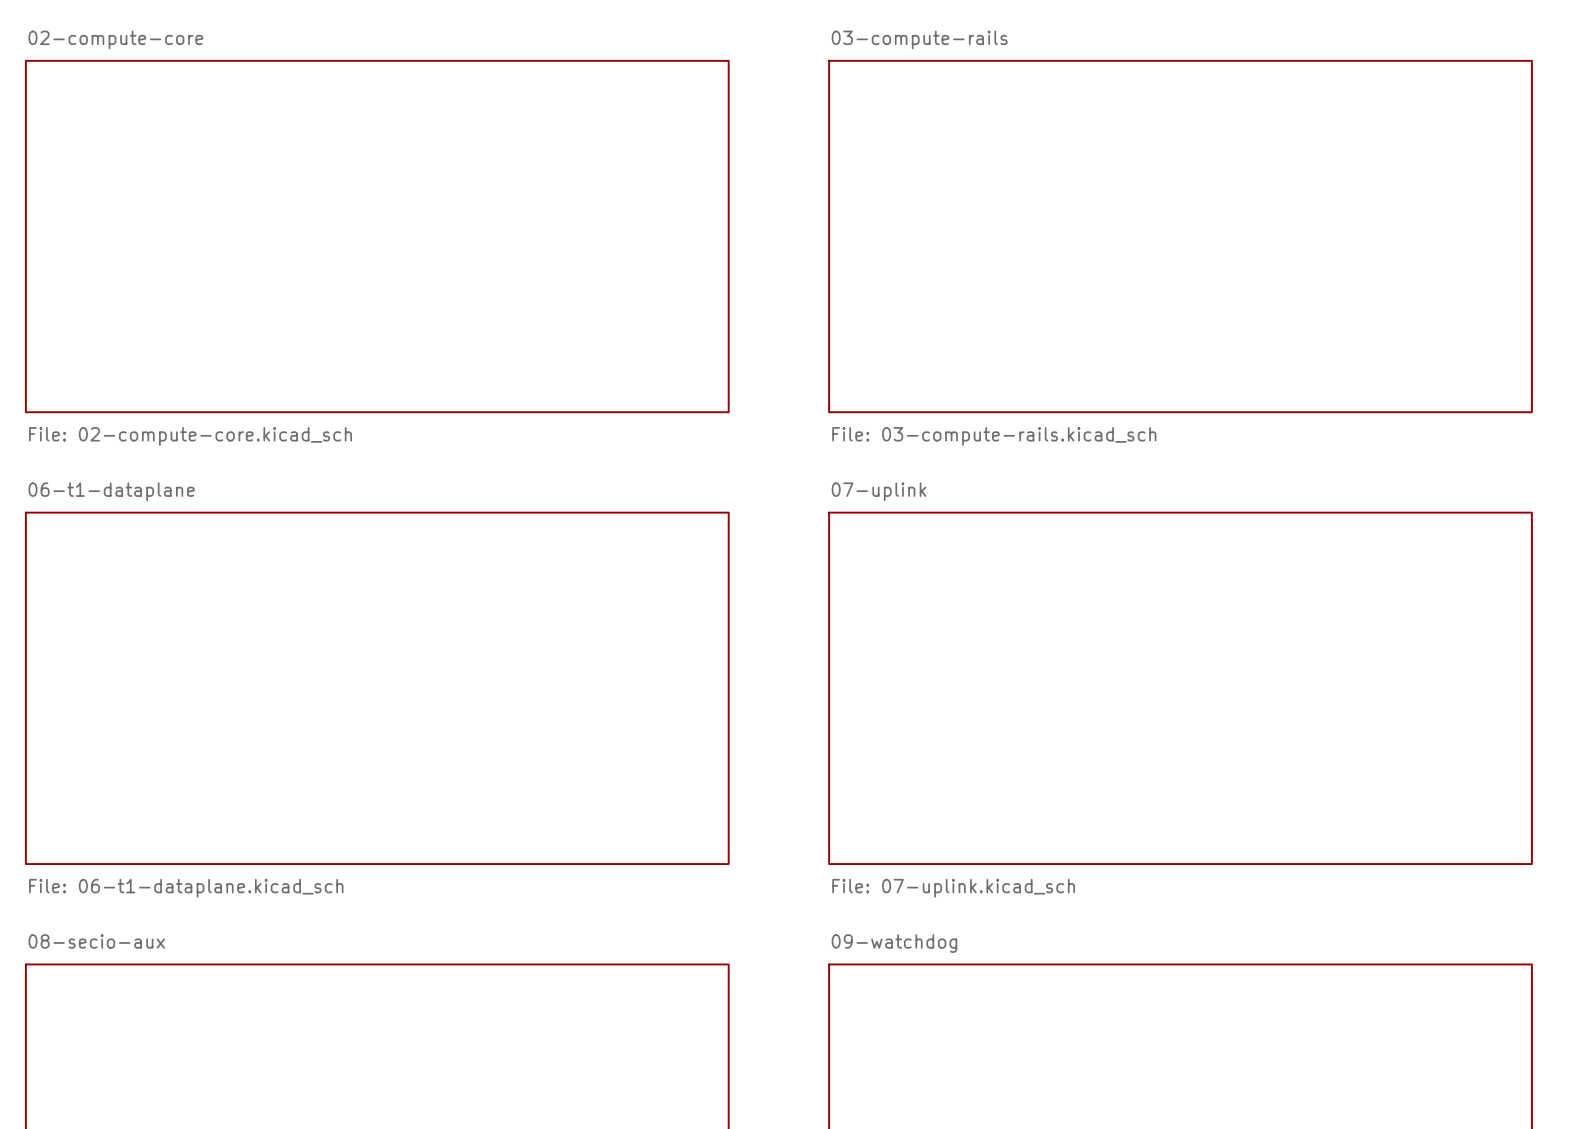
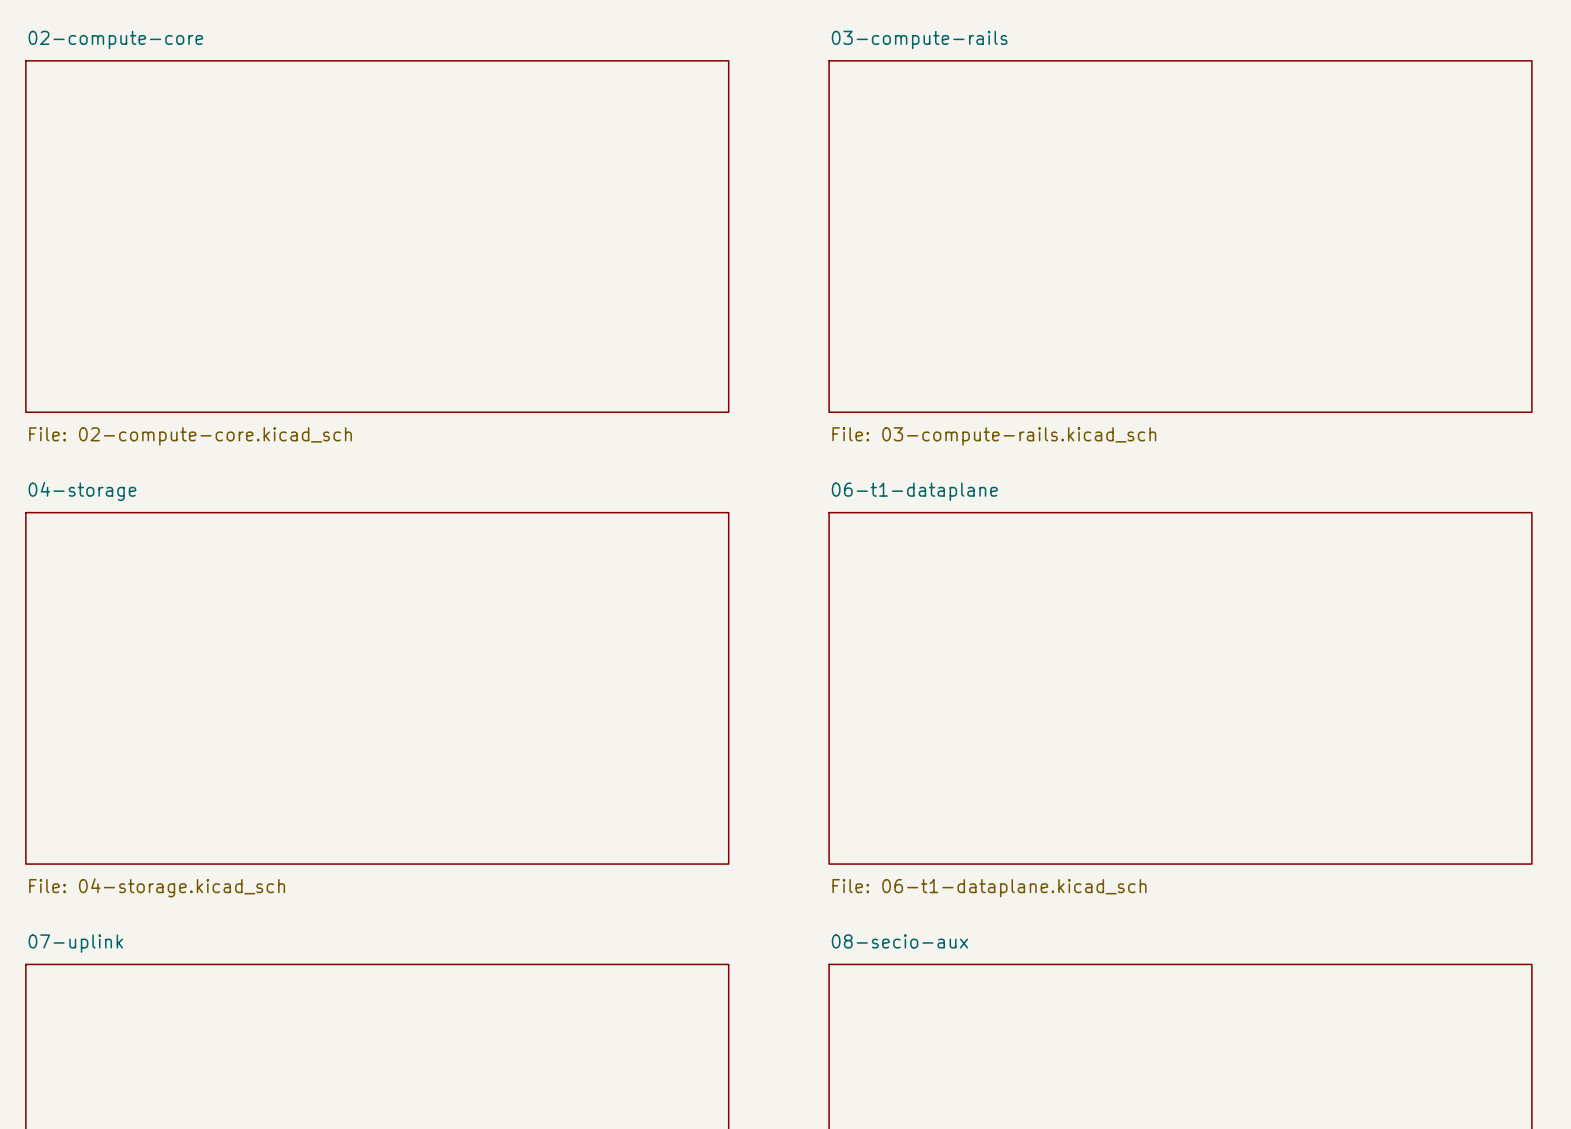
sheet 06-t1-dataplane name: 06-t1-dataplane (111, 491) -> 04-storage (82, 491)
sheet 07-uplink name: 07-uplink (878, 491) -> 06-t1-dataplane (914, 491)
sheet 06-t1-dataplane value: File: 06-t1-dataplane.kicad_sch (186, 888) -> File: 04-storage.kicad_sch (157, 887)
sheet 07-uplink value: File: 07-uplink.kicad_sch (953, 888) -> File: 06-t1-dataplane.kicad_sch (989, 888)
sheet 08-secio-aux name: 08-secio-aux (96, 941) -> 07-uplink (75, 943)
sheet 09-watchdog name: 09-watchdog (894, 943) -> 08-secio-aux (899, 941)

